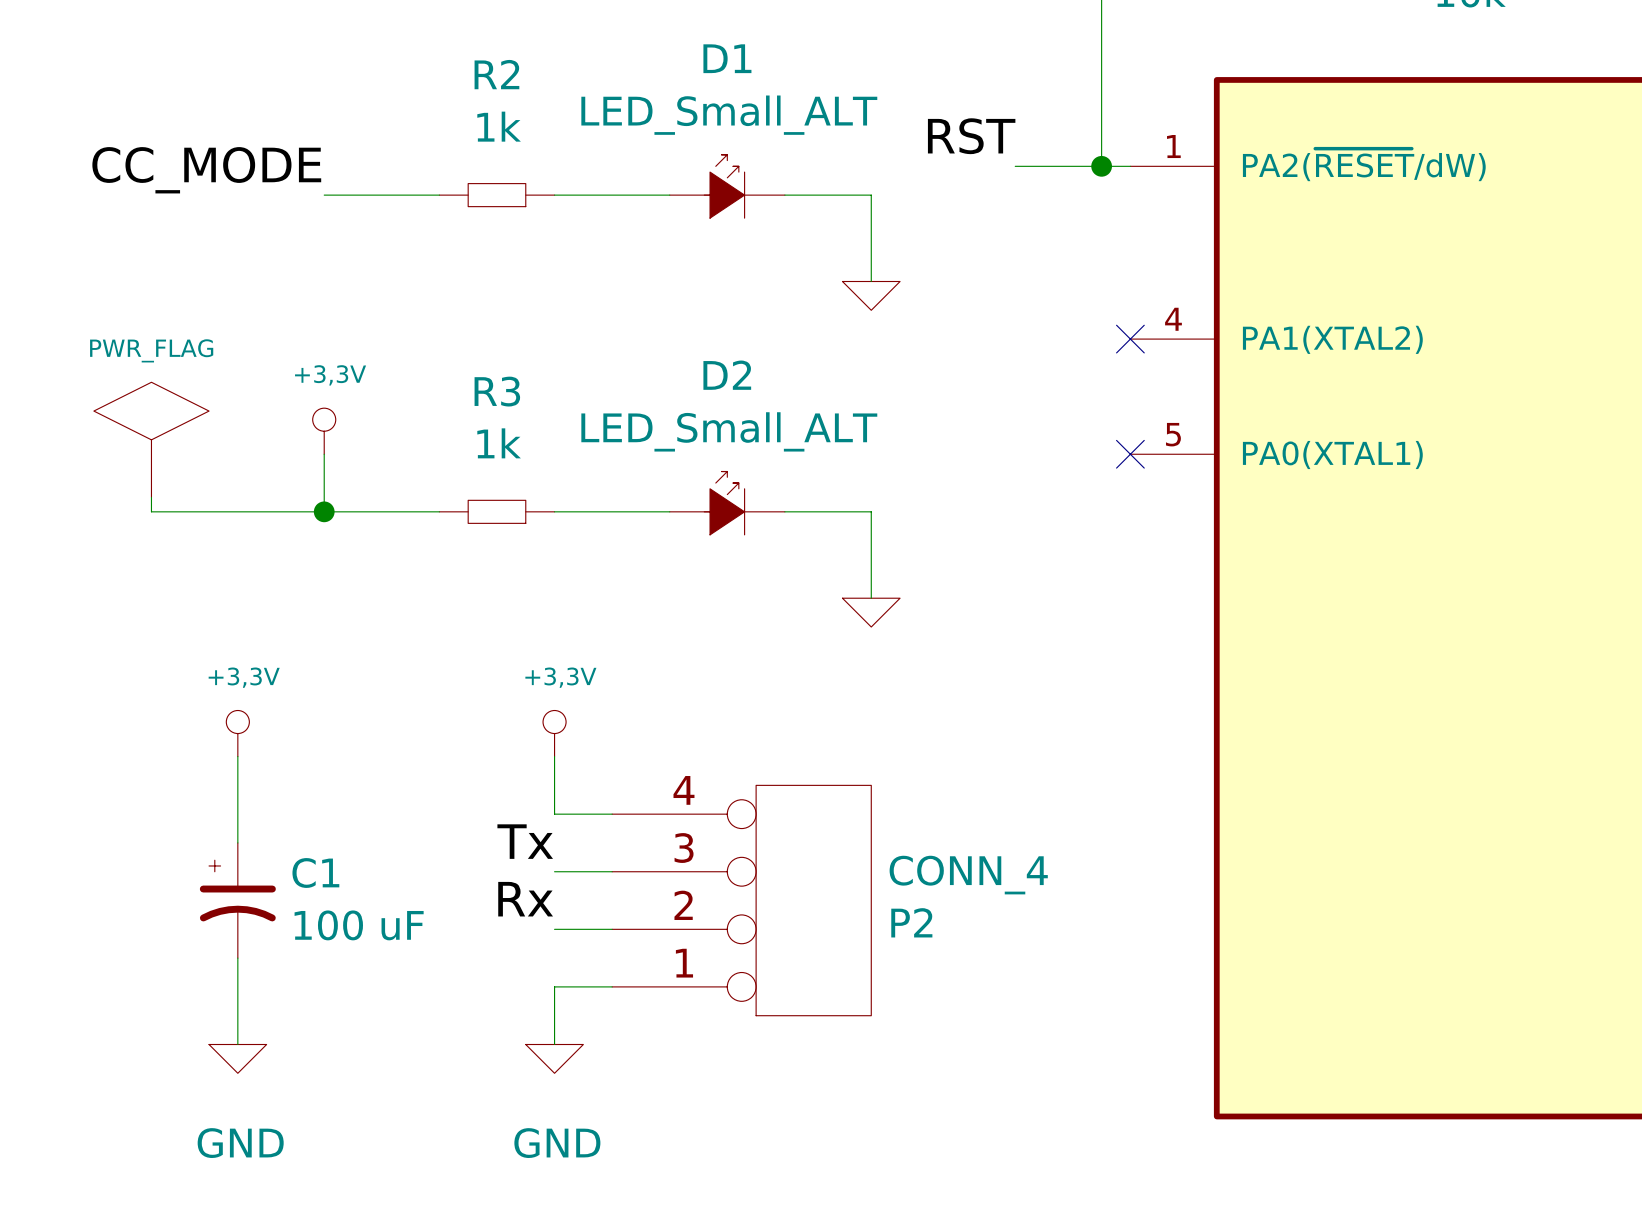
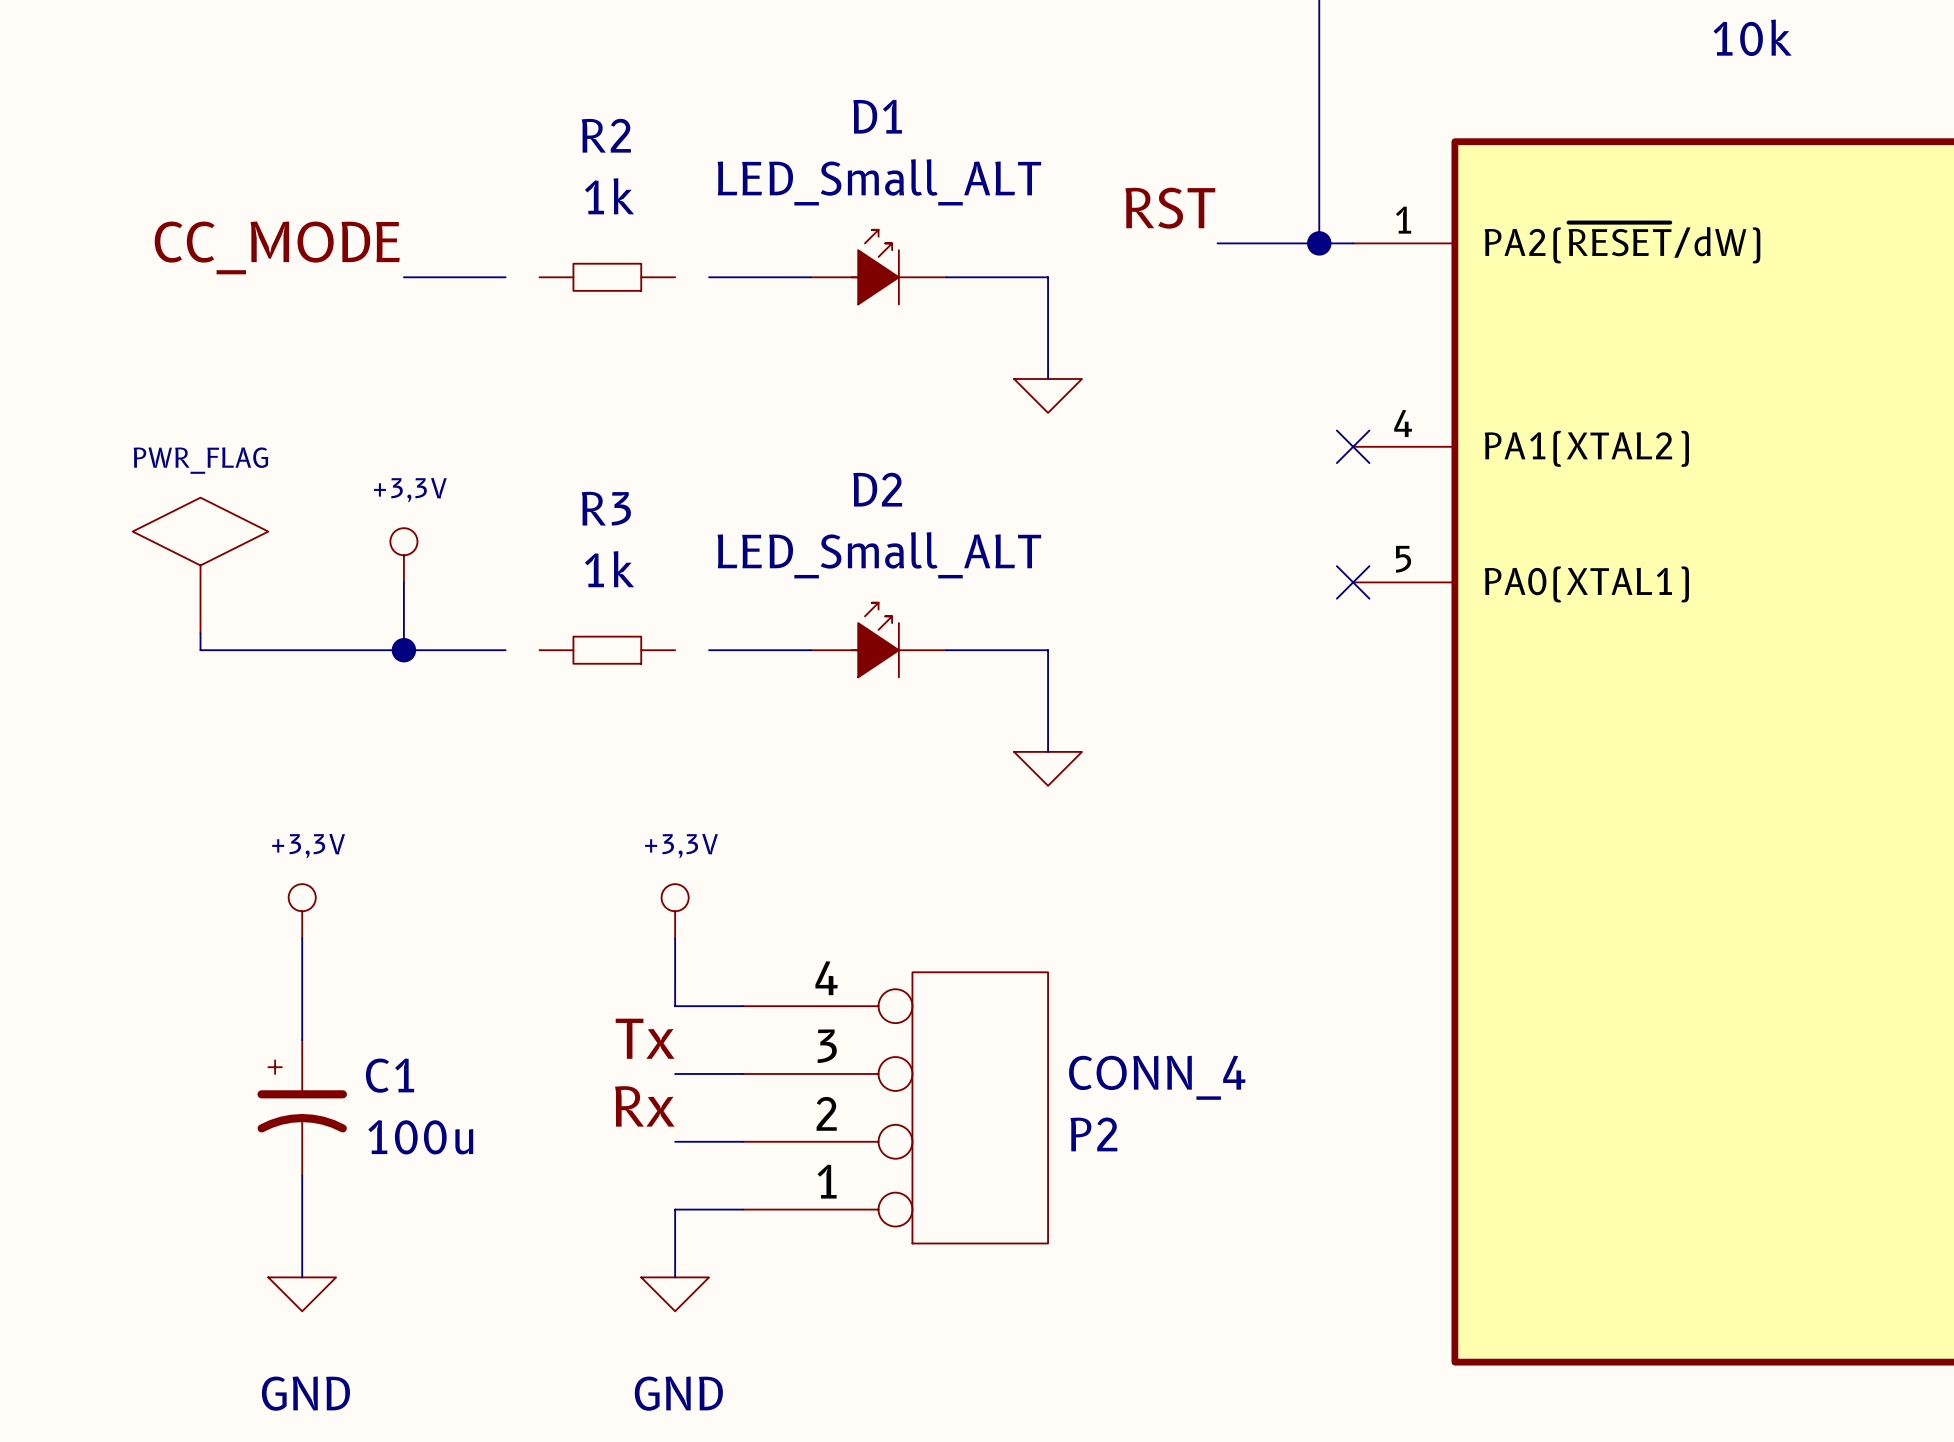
wire: (410, 195) (439, 195) -> none
wire: (554, 195) (583, 195) -> none
wire: (410, 511) (439, 511) -> none
wire: (554, 511) (583, 511) -> none
C1 value: 100 uF (359, 925) -> 100u (420, 1137)

